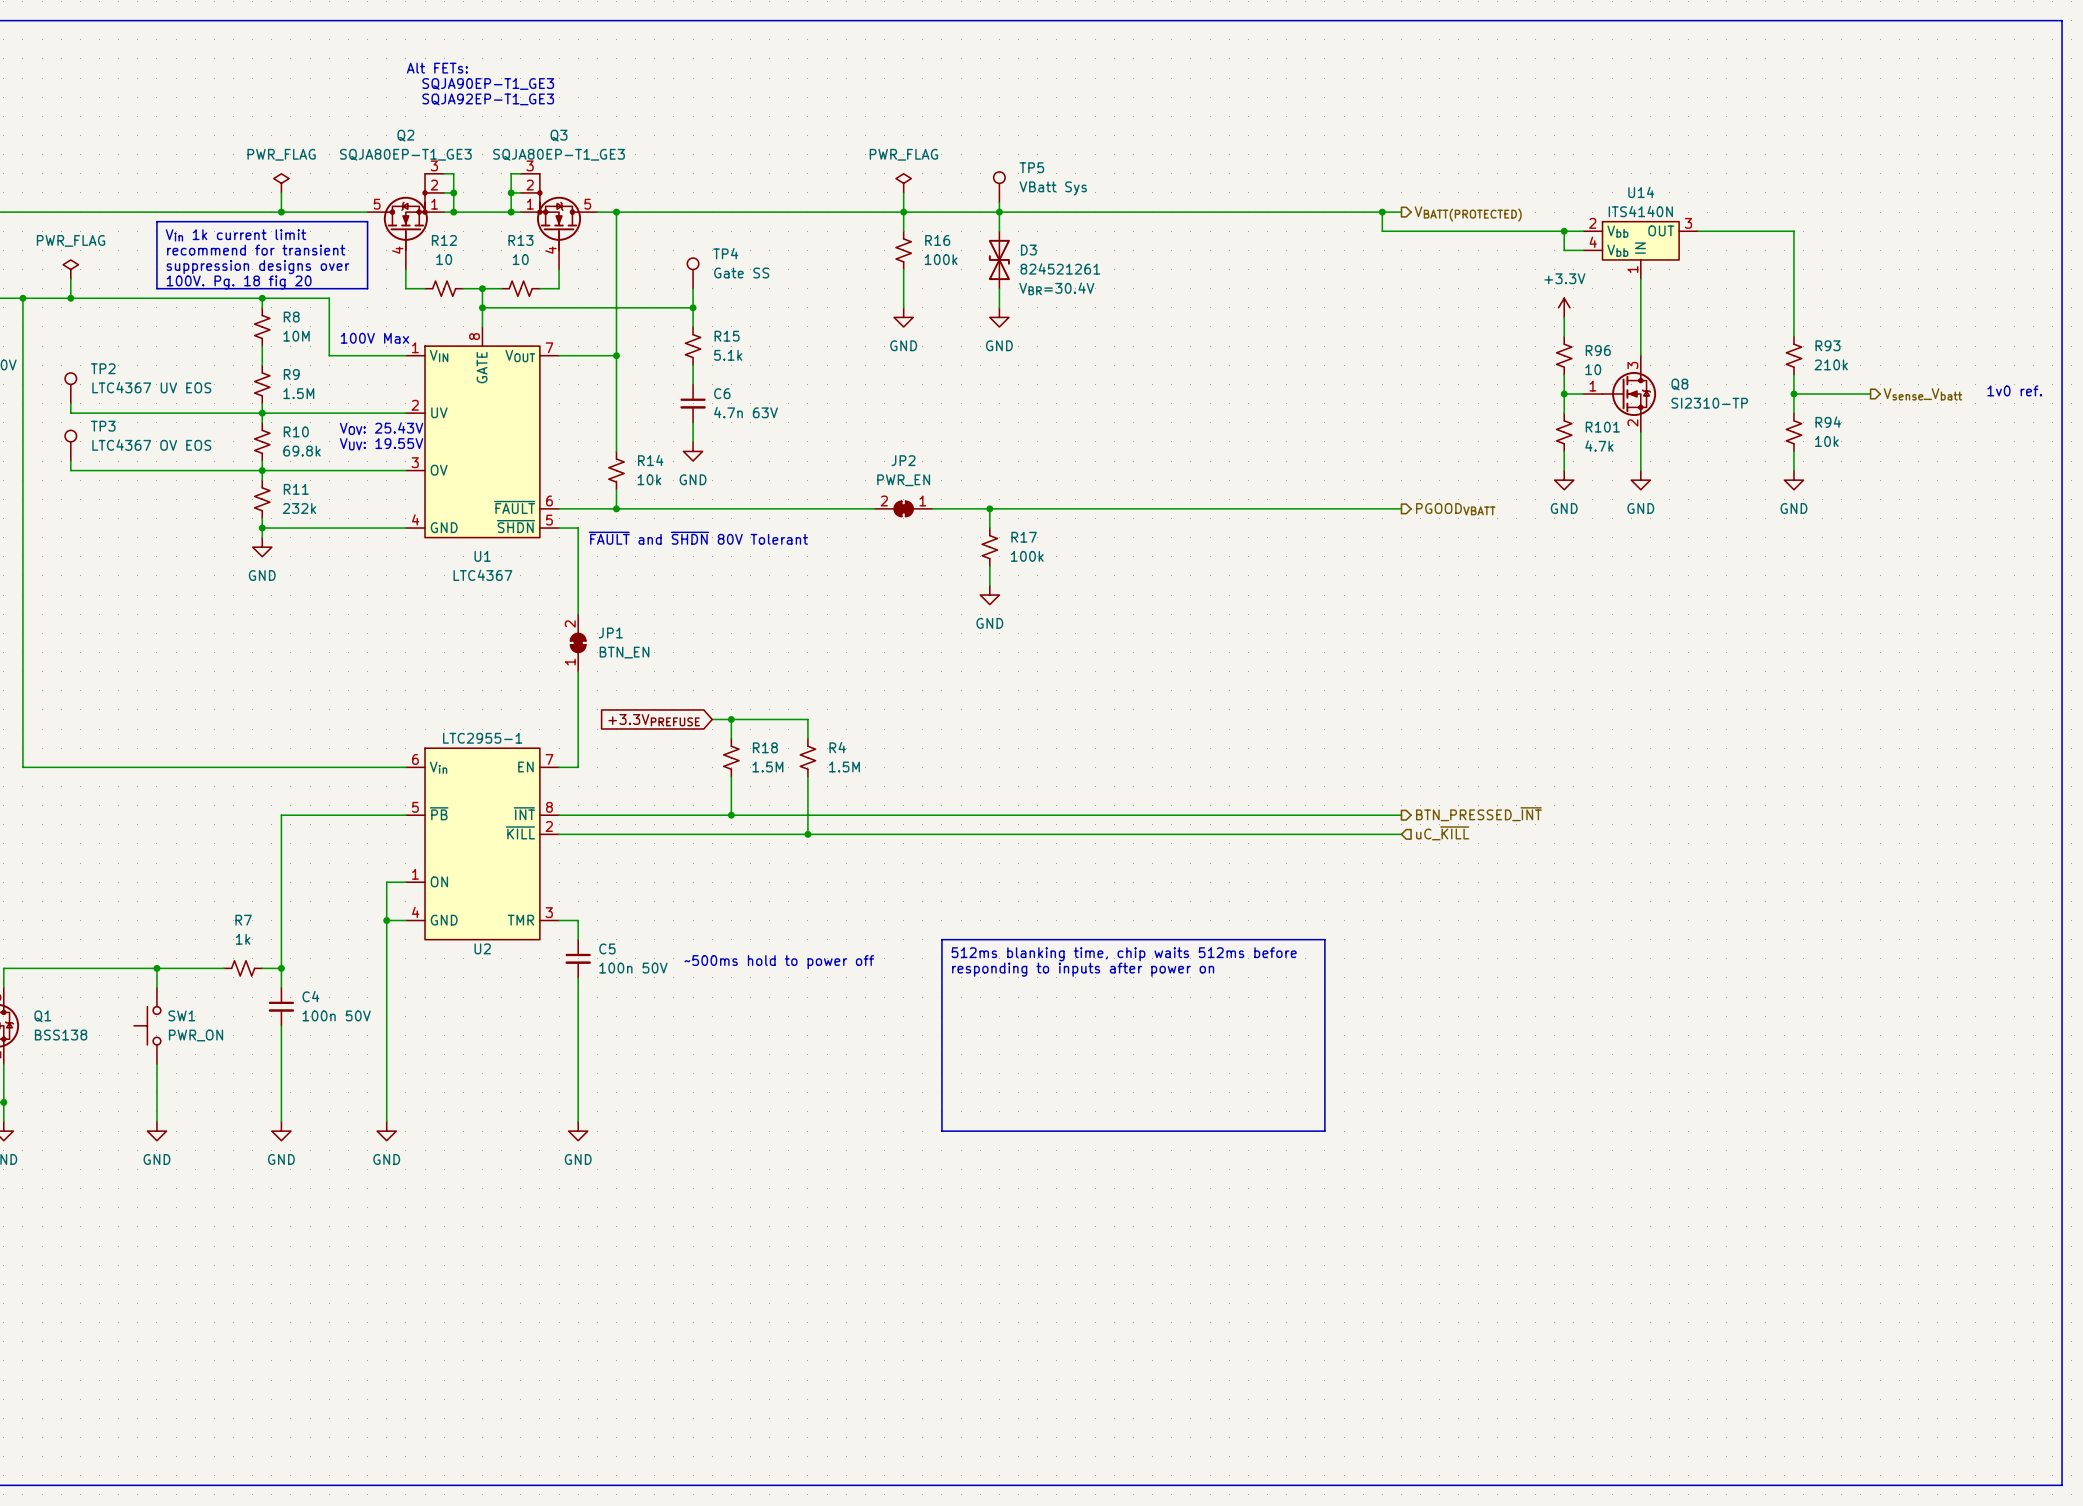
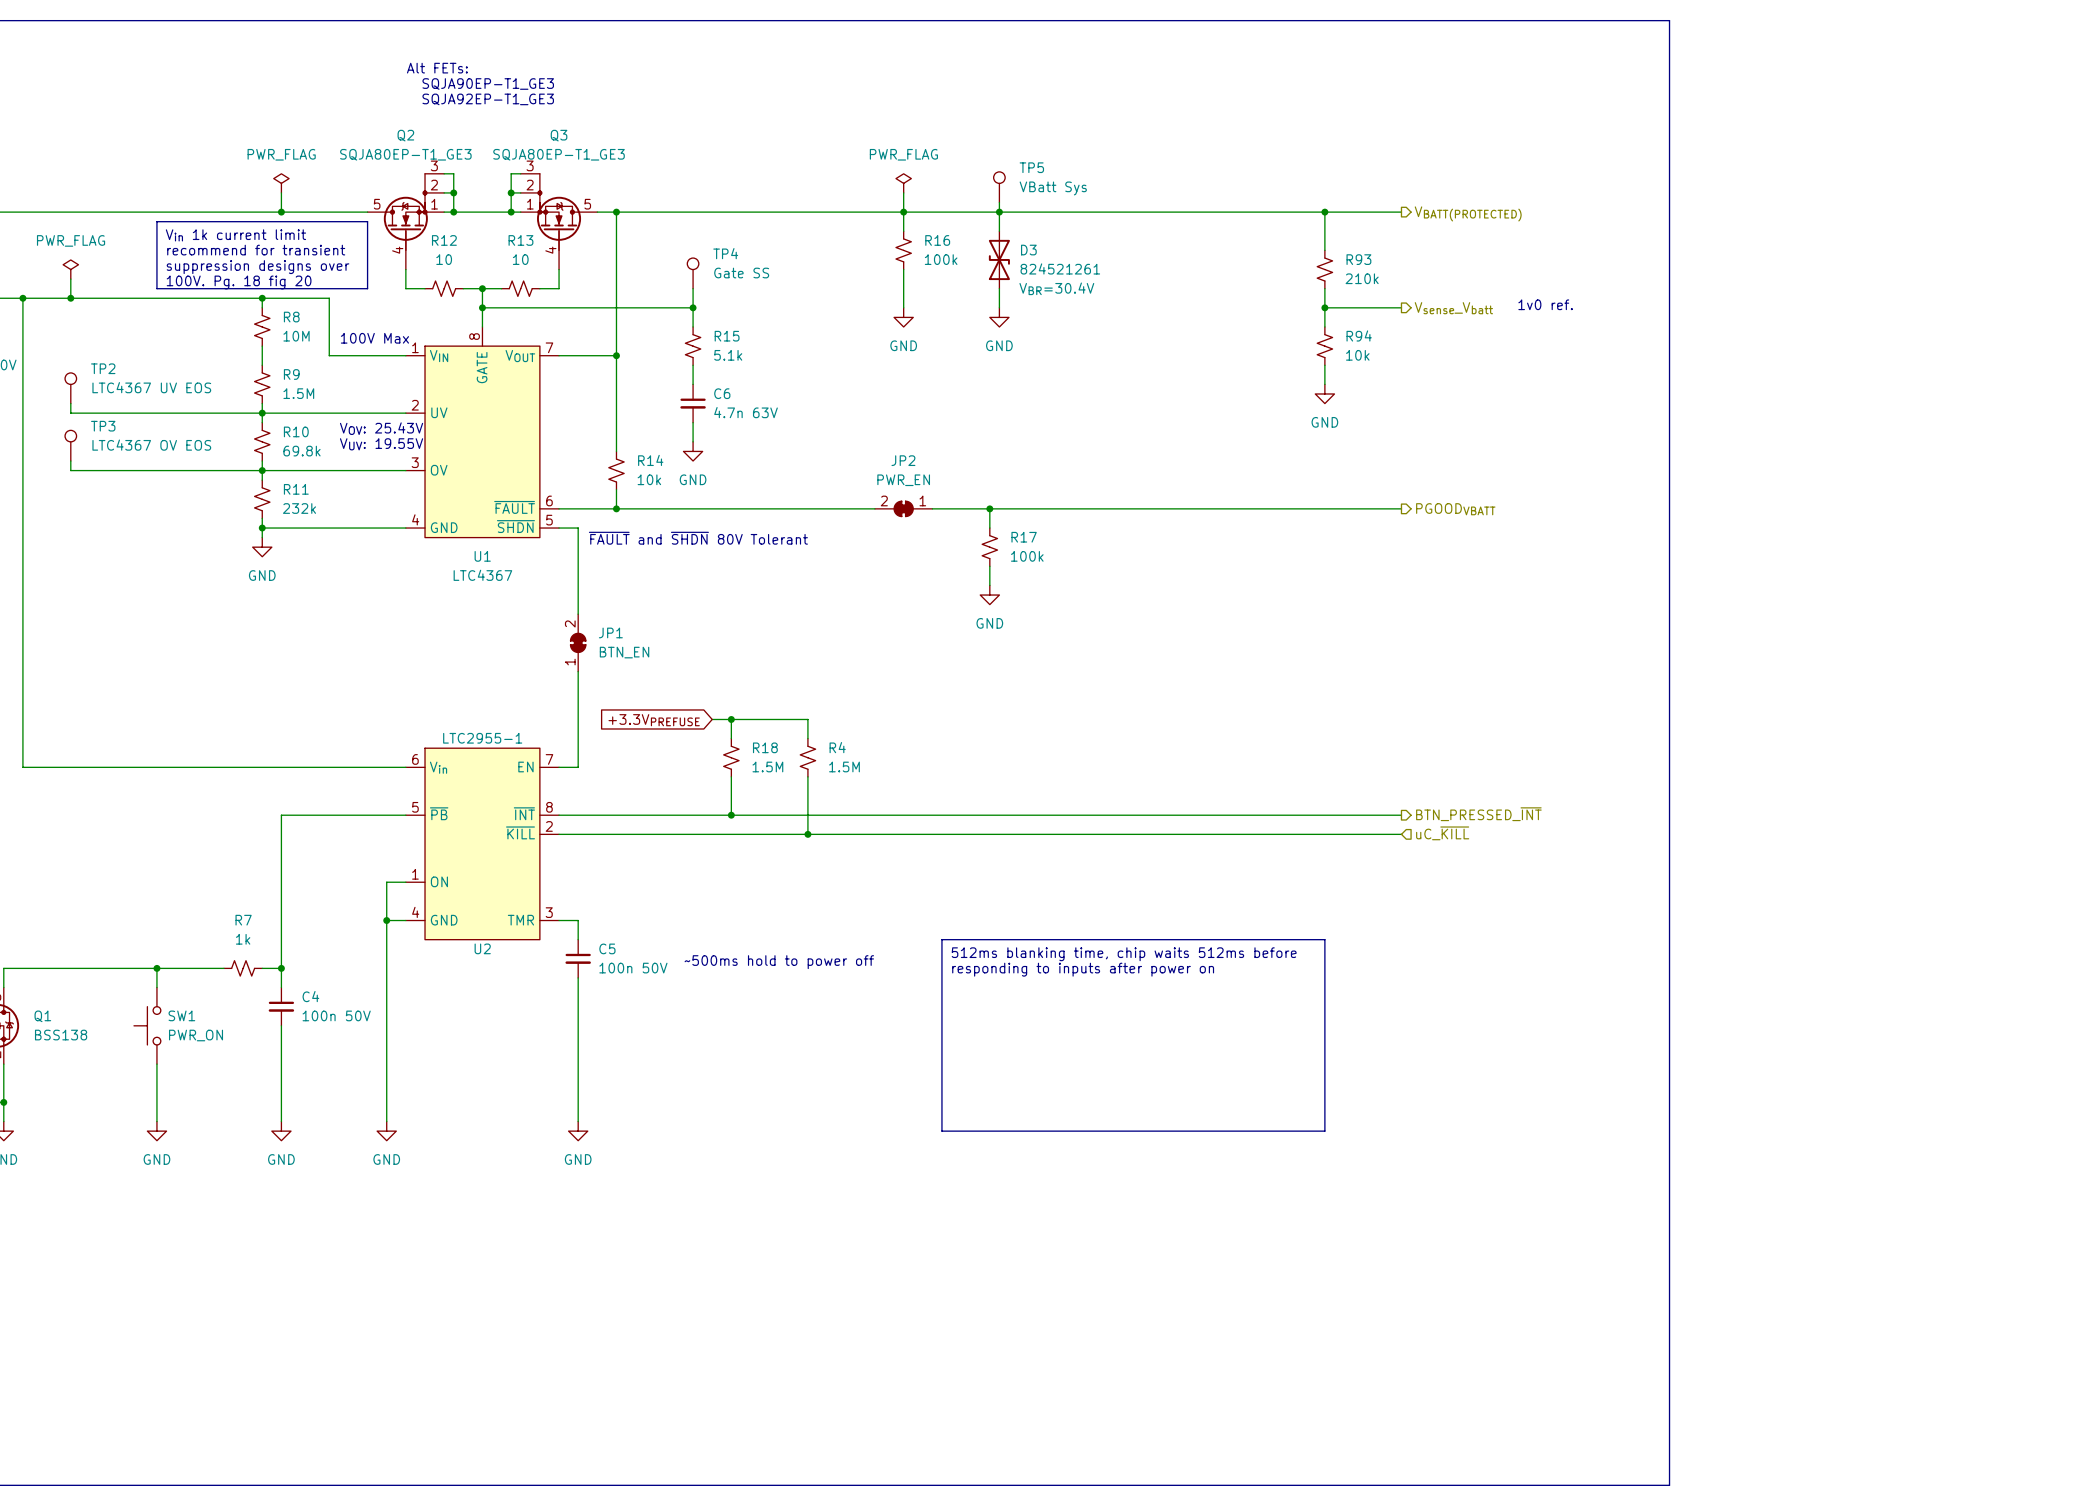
line: (1669, 20) (2062, 20) (2062, 1485) (1669, 1485) -> (1669, 20) (1669, 1485)
wire: none -> (1324, 212) (1324, 250)
junction: none -> (1324, 212)
wire: (1382, 212) (1382, 231) (1583, 231) -> none
junction: (1382, 212) -> none
wire: (1564, 231) (1564, 250) (1583, 250) -> none
junction: (1564, 231) -> none
wire: (1698, 231) (1793, 231) (1793, 336) -> none
U14: ITS4140N (1640, 250) -> none
wire: (1640, 279) (1640, 355) -> none
wire: none -> (1324, 288) (1324, 326)
text: none -> 1v0 ref. (1545, 304)
wire: none -> (1324, 307) (1401, 307)
junction: none -> (1324, 307)
power symbol: +3.3V (1564, 307) -> none
hierarchical label: none -> Vsense_Vbatt (1453, 308)
wire: (1564, 317) (1564, 336) -> none
R96: 10 (1564, 355) -> none
R93 position: (1793, 355) -> (1324, 269)
wire: none -> (1324, 365) (1324, 384)
wire: (1564, 374) (1564, 413) -> none
wire: (1793, 374) (1793, 413) -> none
text: 1v0 ref. (2014, 390) -> none
power symbol: none -> GND (1324, 393)
wire: (1564, 393) (1583, 393) -> none
junction: (1564, 393) -> none
Q8: SI2310-TP (1619, 393) -> none
wire: (1793, 393) (1870, 393) -> none
junction: (1793, 393) -> none
hierarchical label: Vsense_Vbatt (1922, 394) -> none
R101: 4.7k (1564, 432) -> none
wire: (1640, 432) (1640, 470) -> none
R94 position: (1793, 432) -> (1324, 346)
wire: (1564, 451) (1564, 470) -> none
wire: (1793, 451) (1793, 470) -> none
power symbol: GND (1564, 480) -> none
power symbol: GND (1640, 480) -> none
power symbol: GND (1793, 480) -> none

